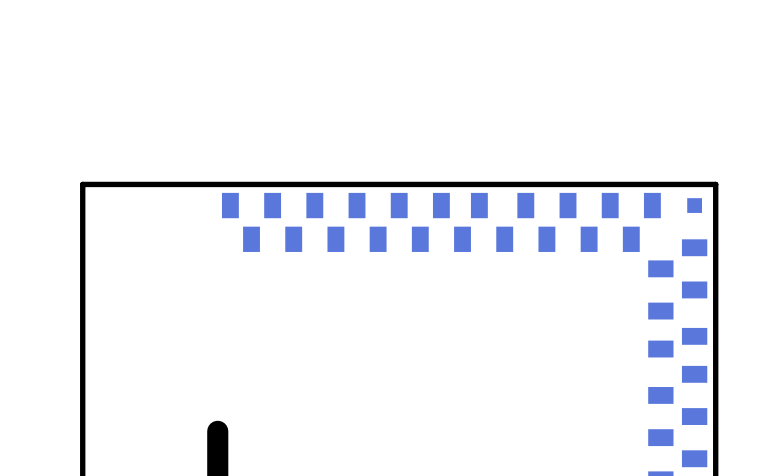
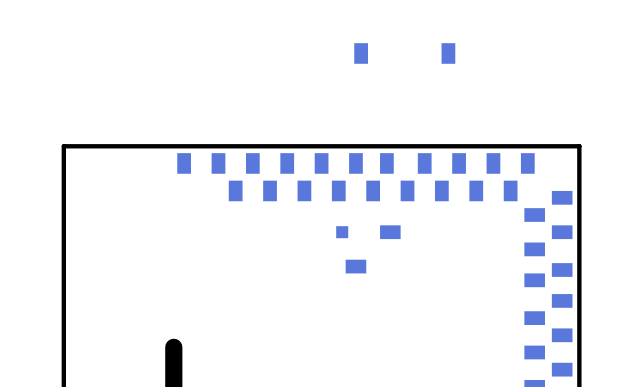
part: none -> (361, 53)
part: none -> (448, 53)
part position: (694, 205) -> (342, 232)
part: (251, 239) -> none
part: none -> (390, 232)
part: none -> (355, 266)

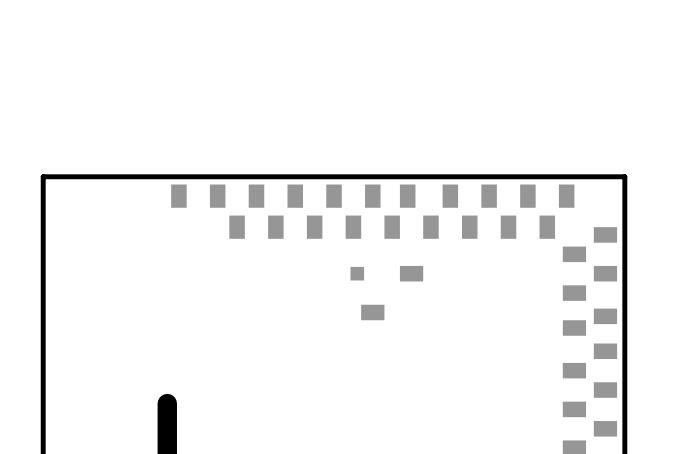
part: (361, 53) -> none
part: (448, 53) -> none

